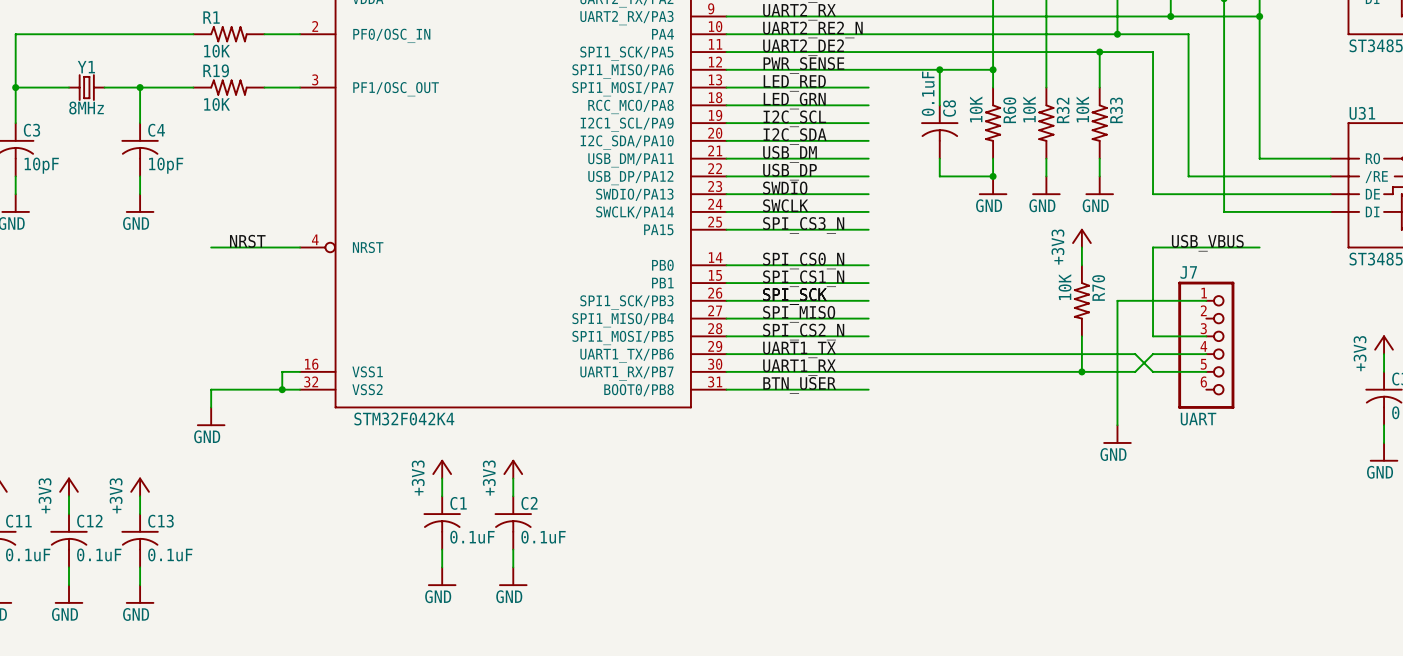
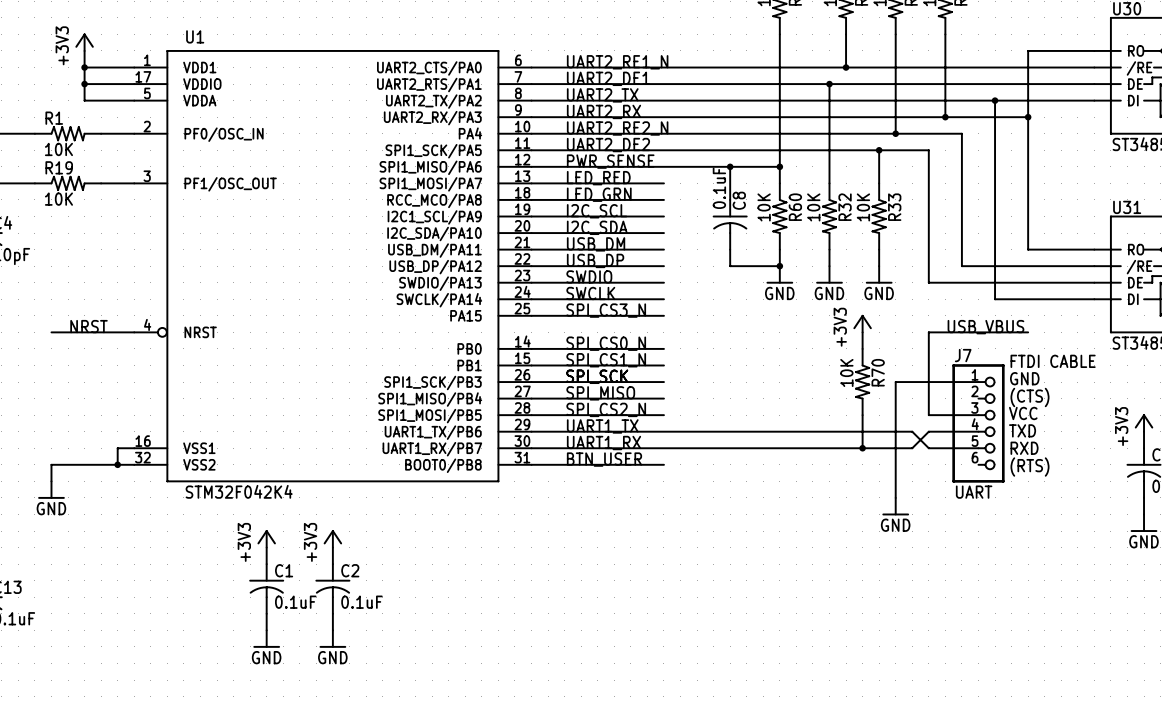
text: none -> FTDI CABLE (1053, 361)
text: none -> GND (1024, 378)
text: none -> (CTS) (1029, 397)
text: none -> VCC (1023, 413)
text: none -> TXD (1022, 430)
text: none -> RXD (1024, 448)
text: none -> (RTS) (1029, 467)

